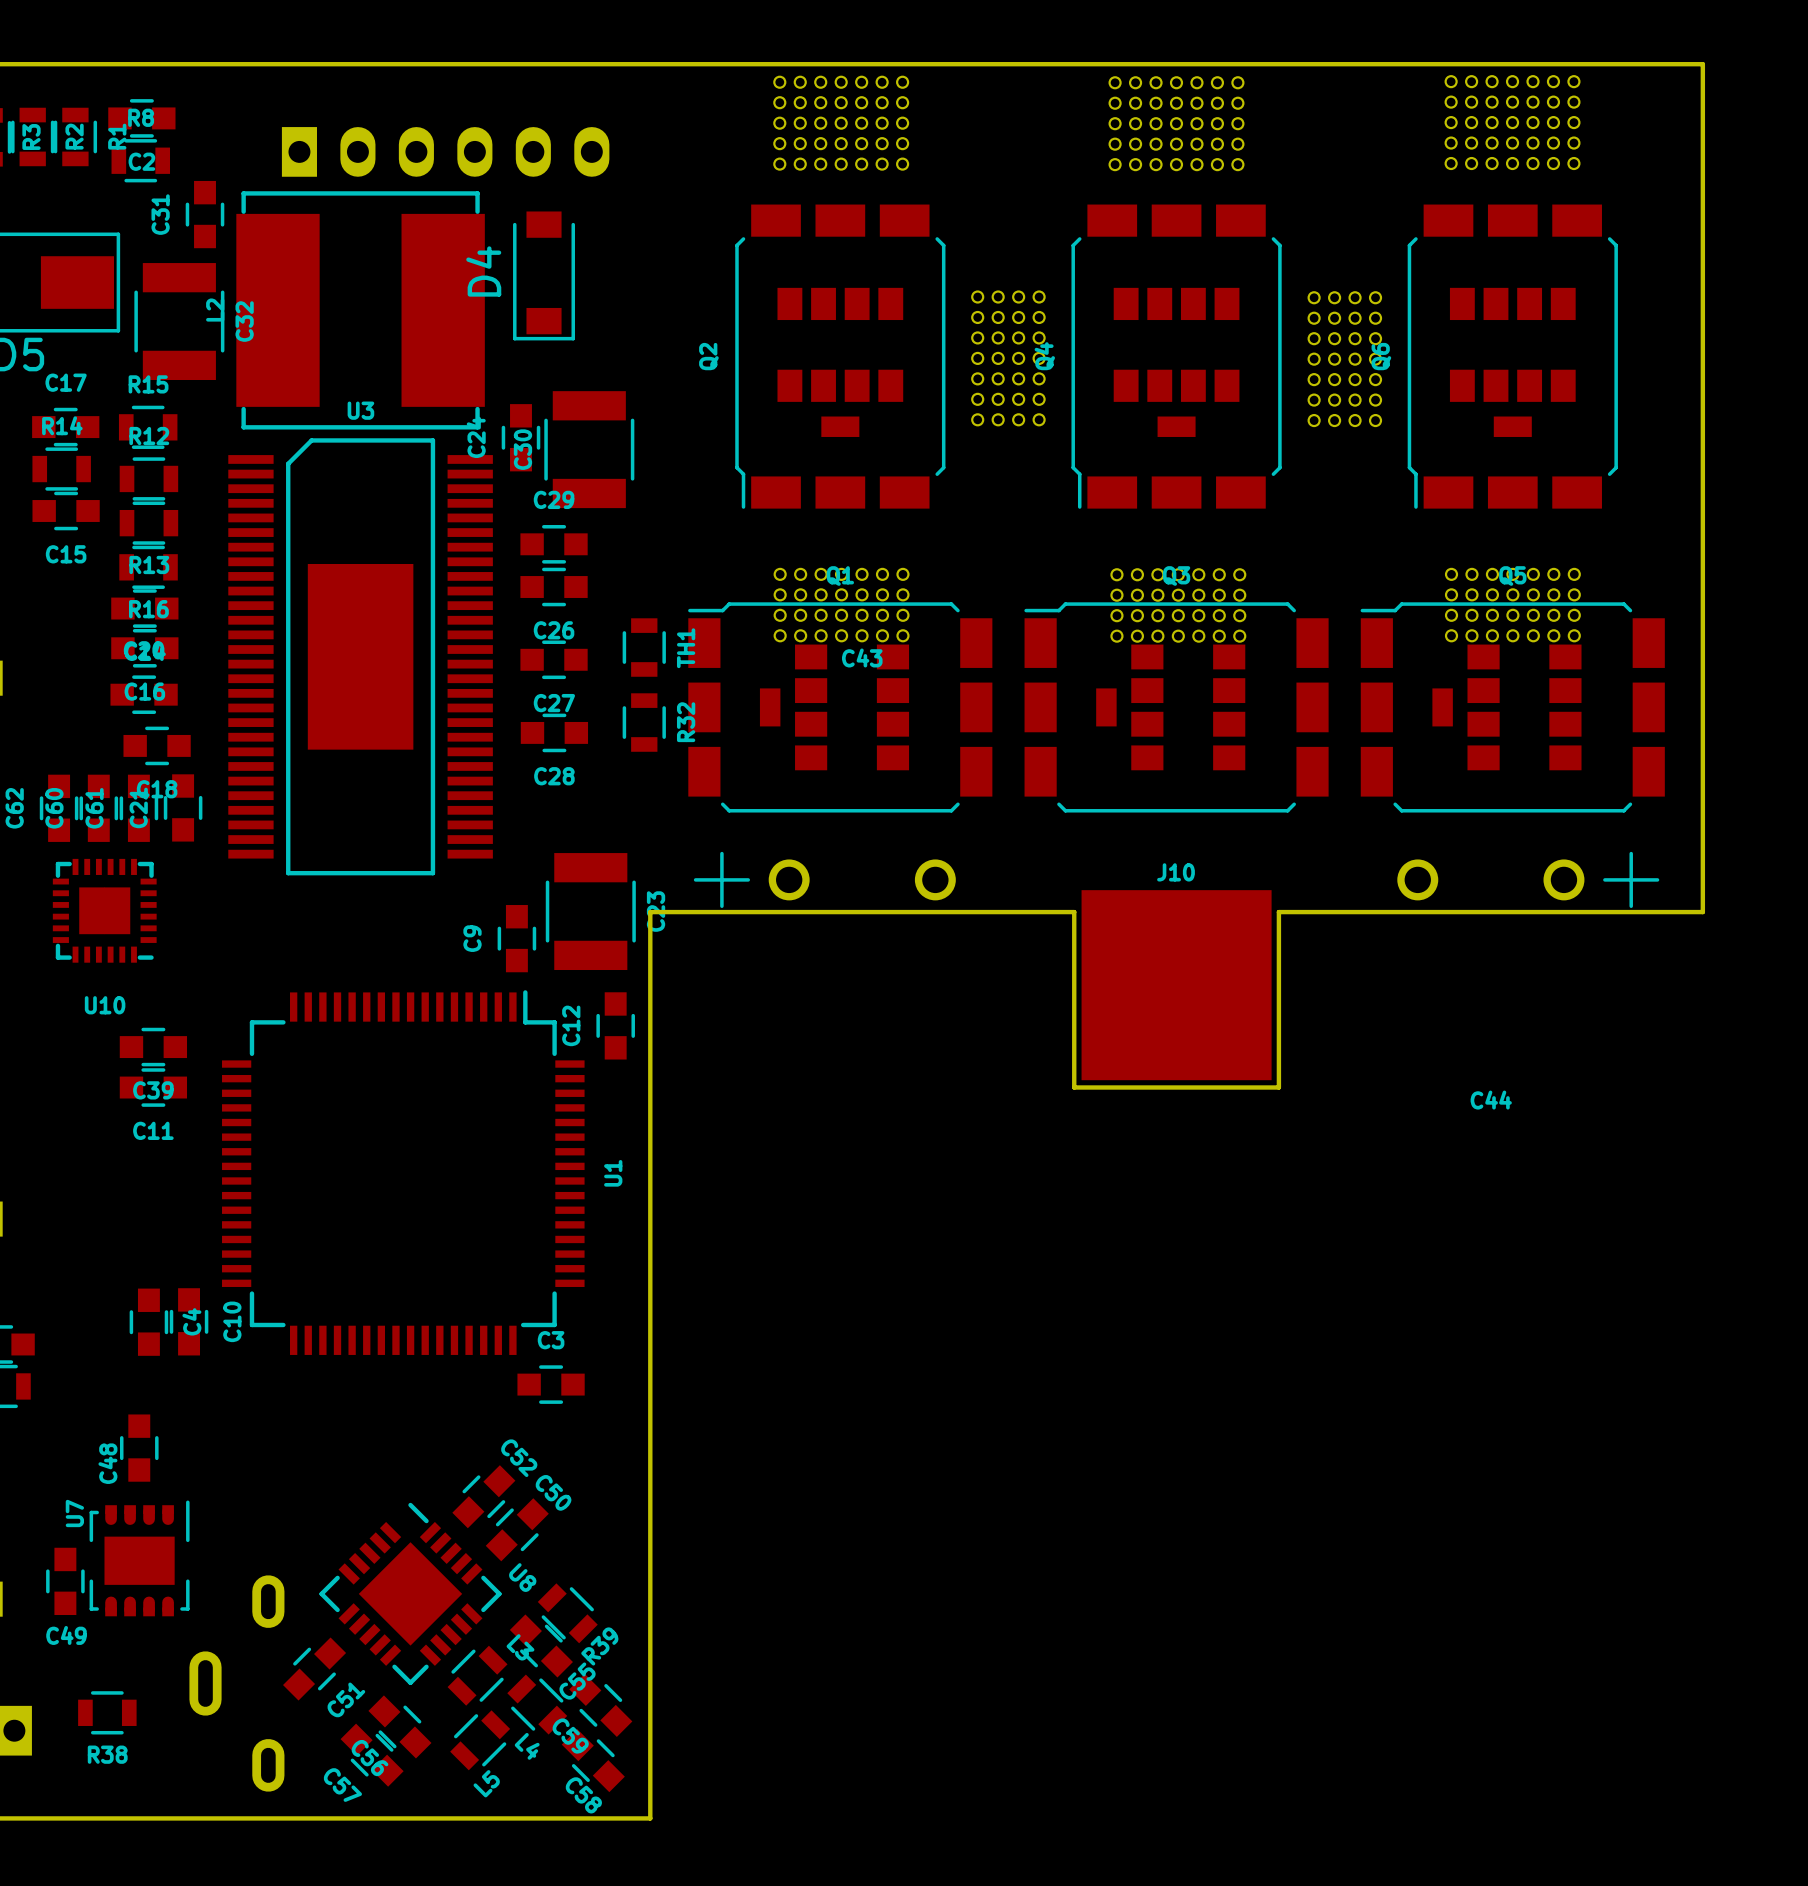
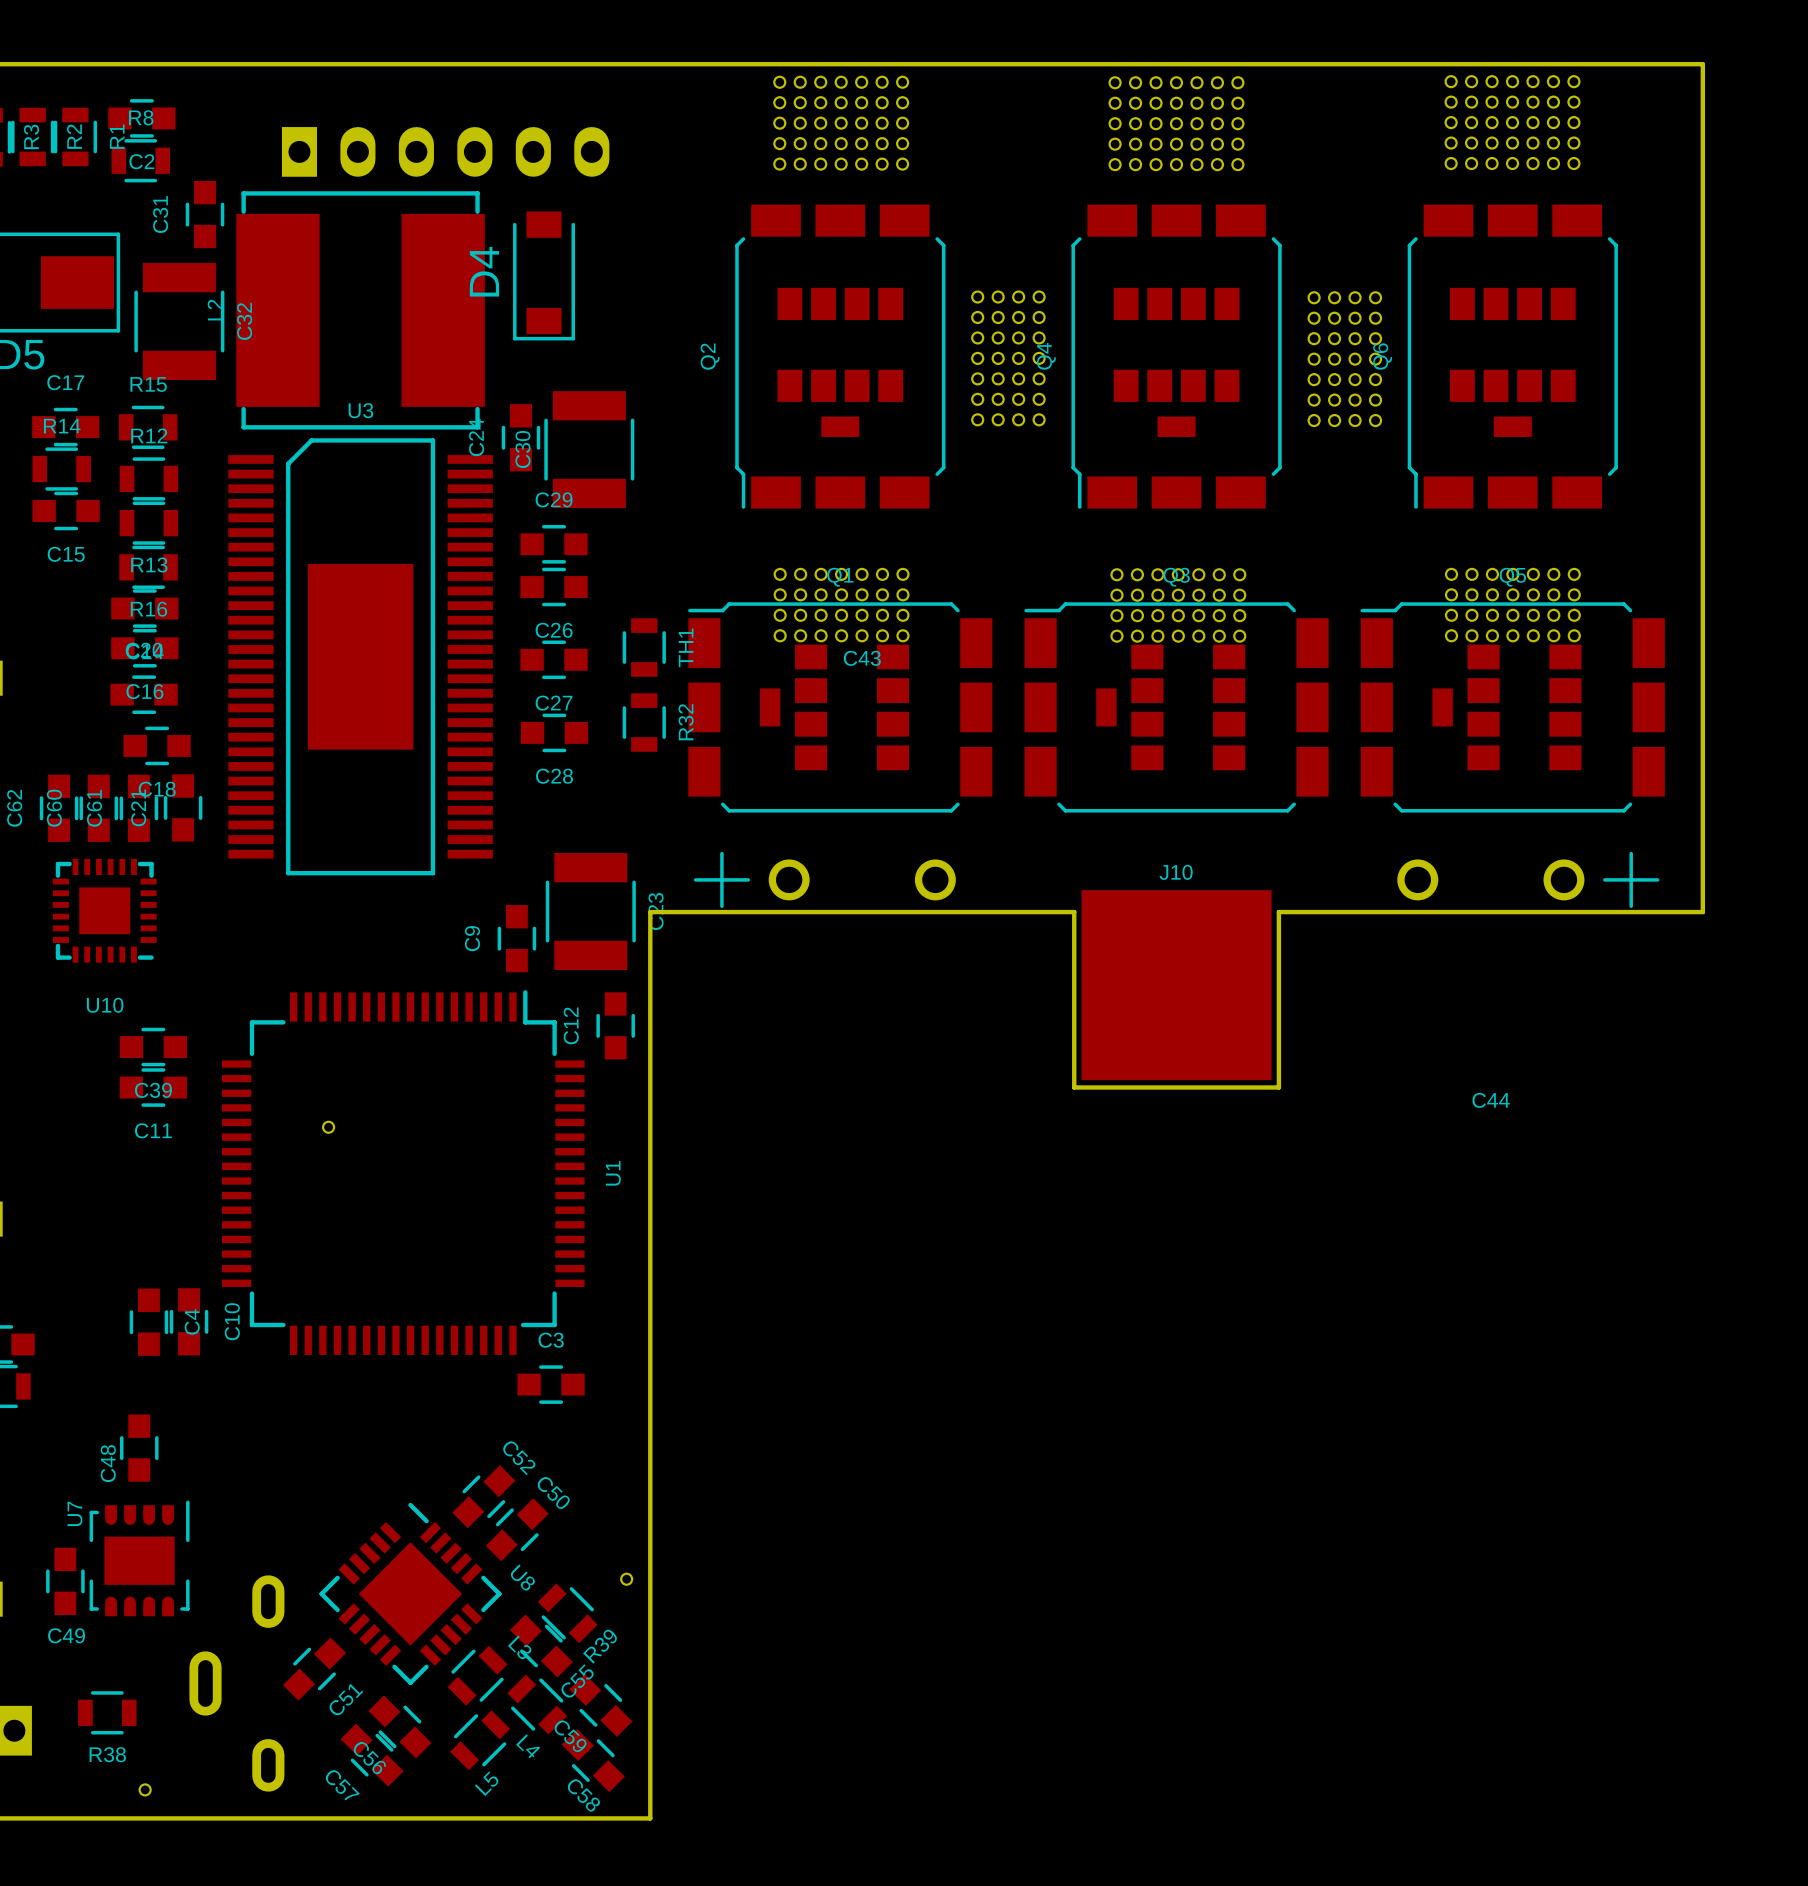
part: none -> (328, 1127)
part: none -> (626, 1579)
part: none -> (145, 1789)

